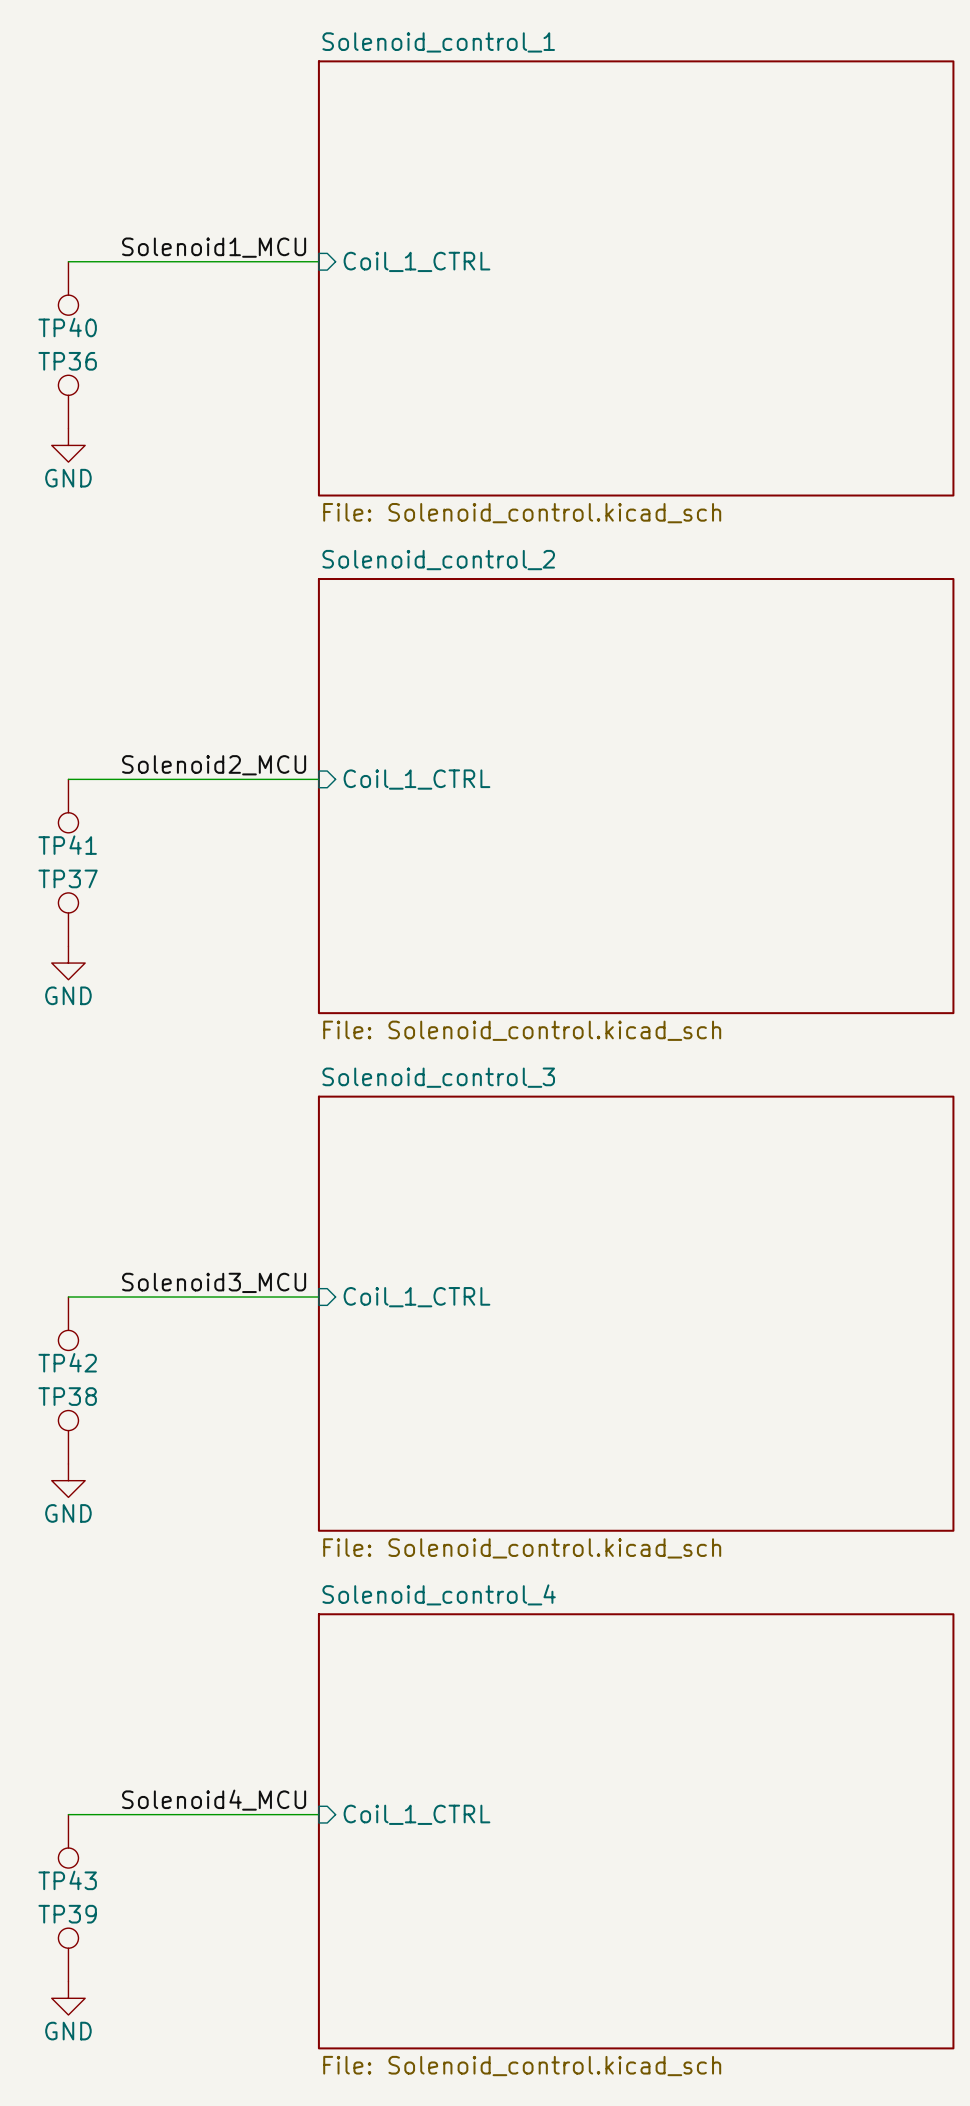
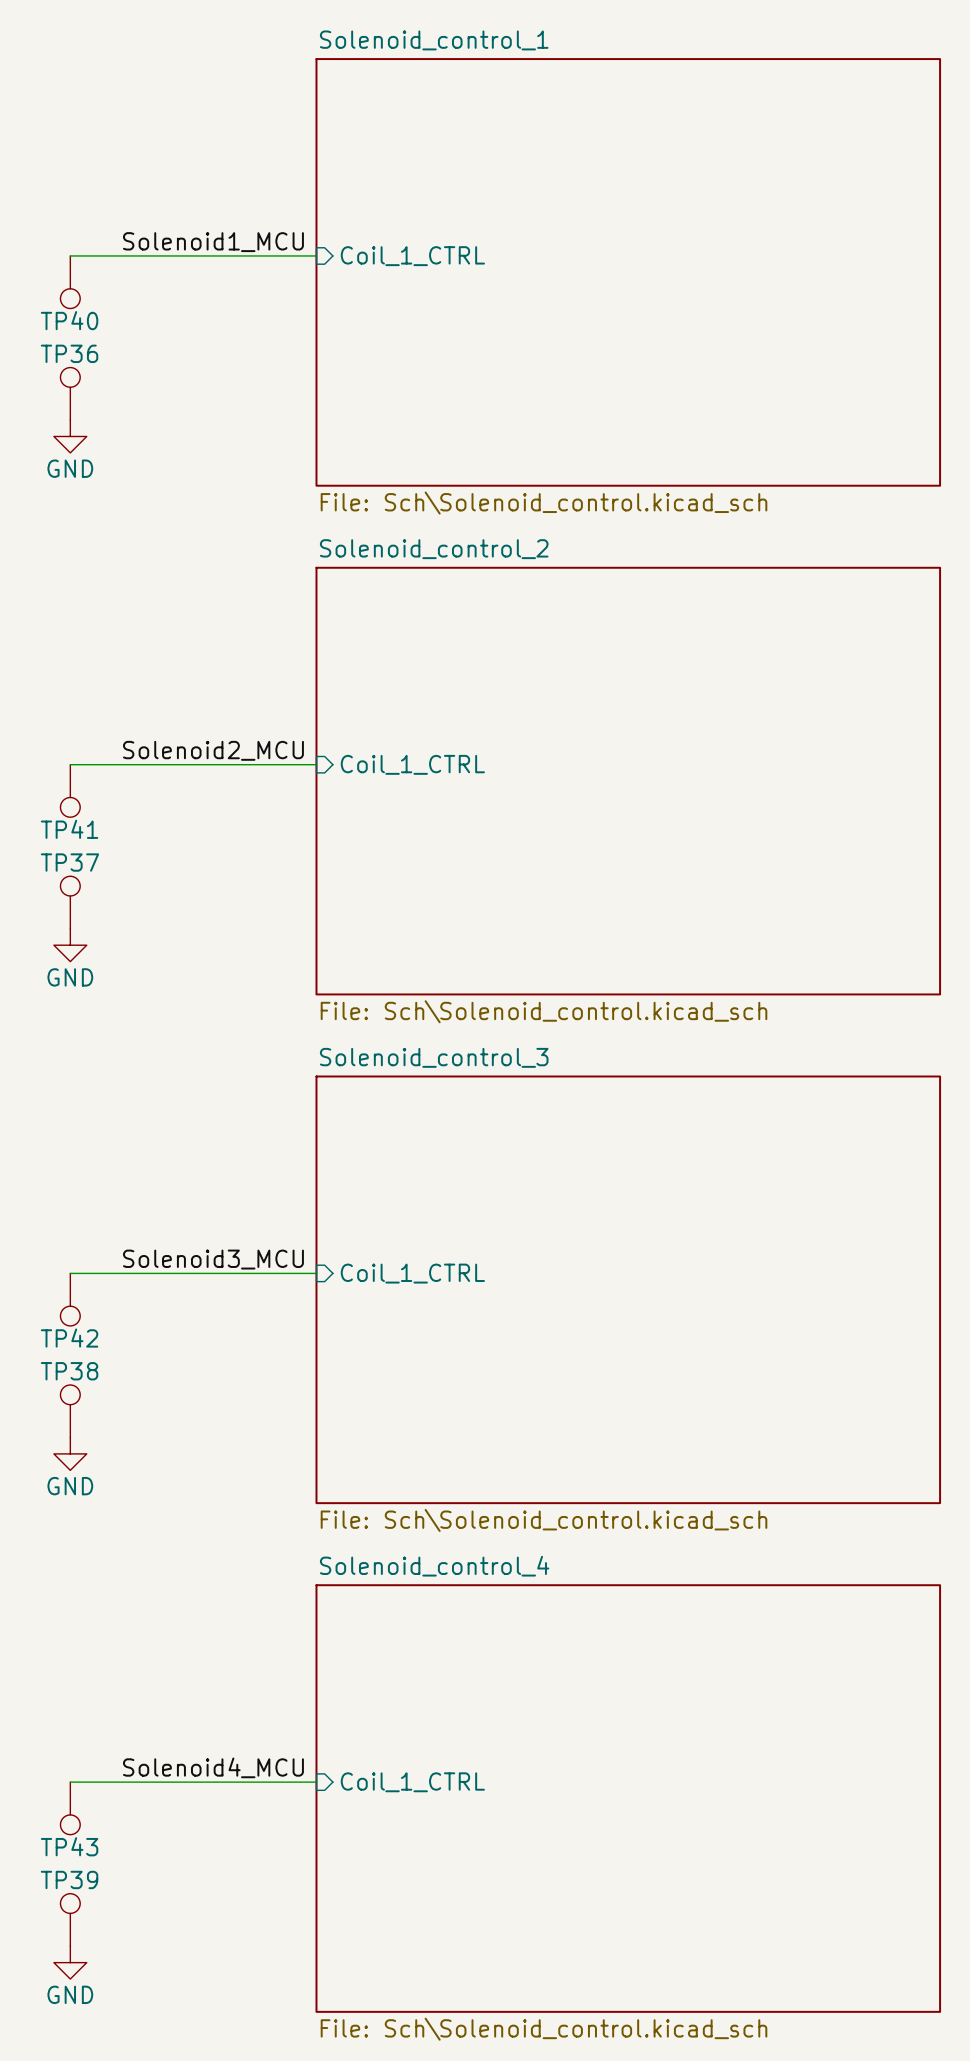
sheet Solenoid_control_1 value: File: Solenoid_control.kicad_sch (522, 513) -> File: Sch\Solenoid_control.kicad_sch (544, 503)
sheet Solenoid_control_2 value: File: Solenoid_control.kicad_sch (522, 1030) -> File: Sch\Solenoid_control.kicad_sch (544, 1011)
sheet Solenoid_control_3 value: File: Solenoid_control.kicad_sch (522, 1548) -> File: Sch\Solenoid_control.kicad_sch (544, 1520)
sheet Solenoid_control_4 value: File: Solenoid_control.kicad_sch (522, 2066) -> File: Sch\Solenoid_control.kicad_sch (544, 2029)

